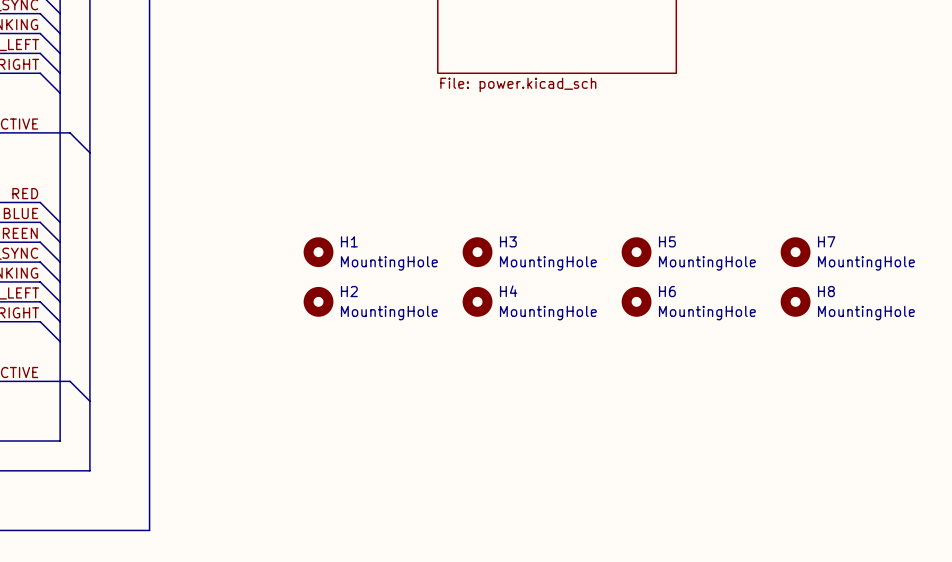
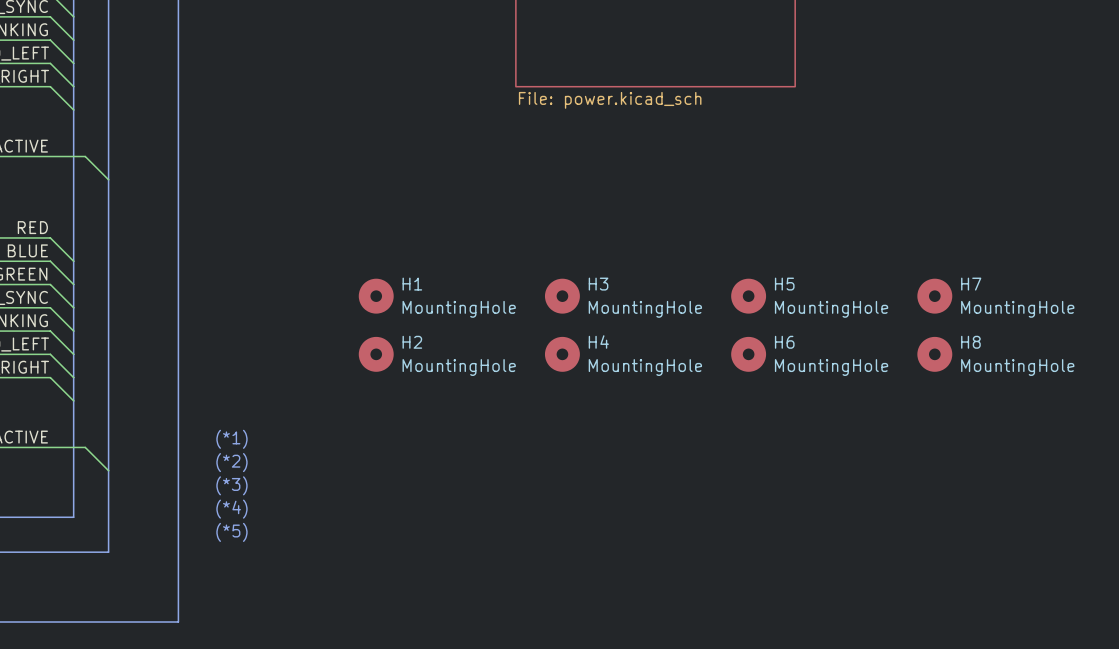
text: none -> (*1) (231, 439)
text: none -> (*2) (231, 462)
text: none -> (*3) (231, 485)
text: none -> (*4) (231, 509)
text: none -> (*5) (231, 532)

